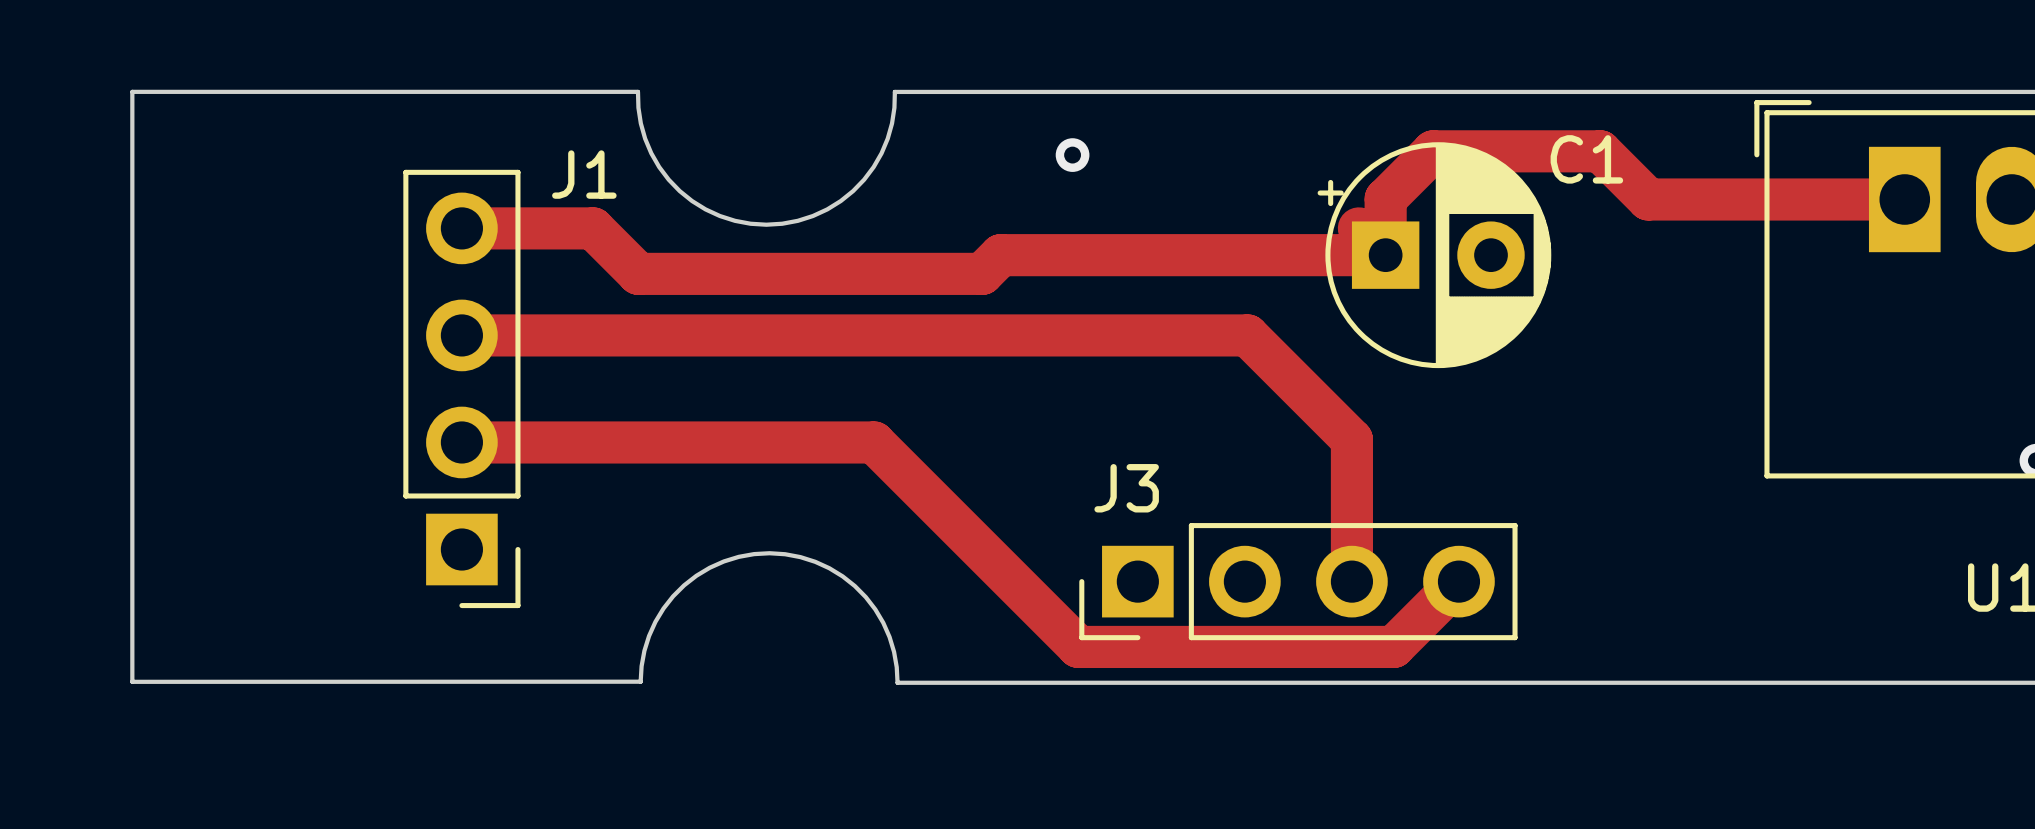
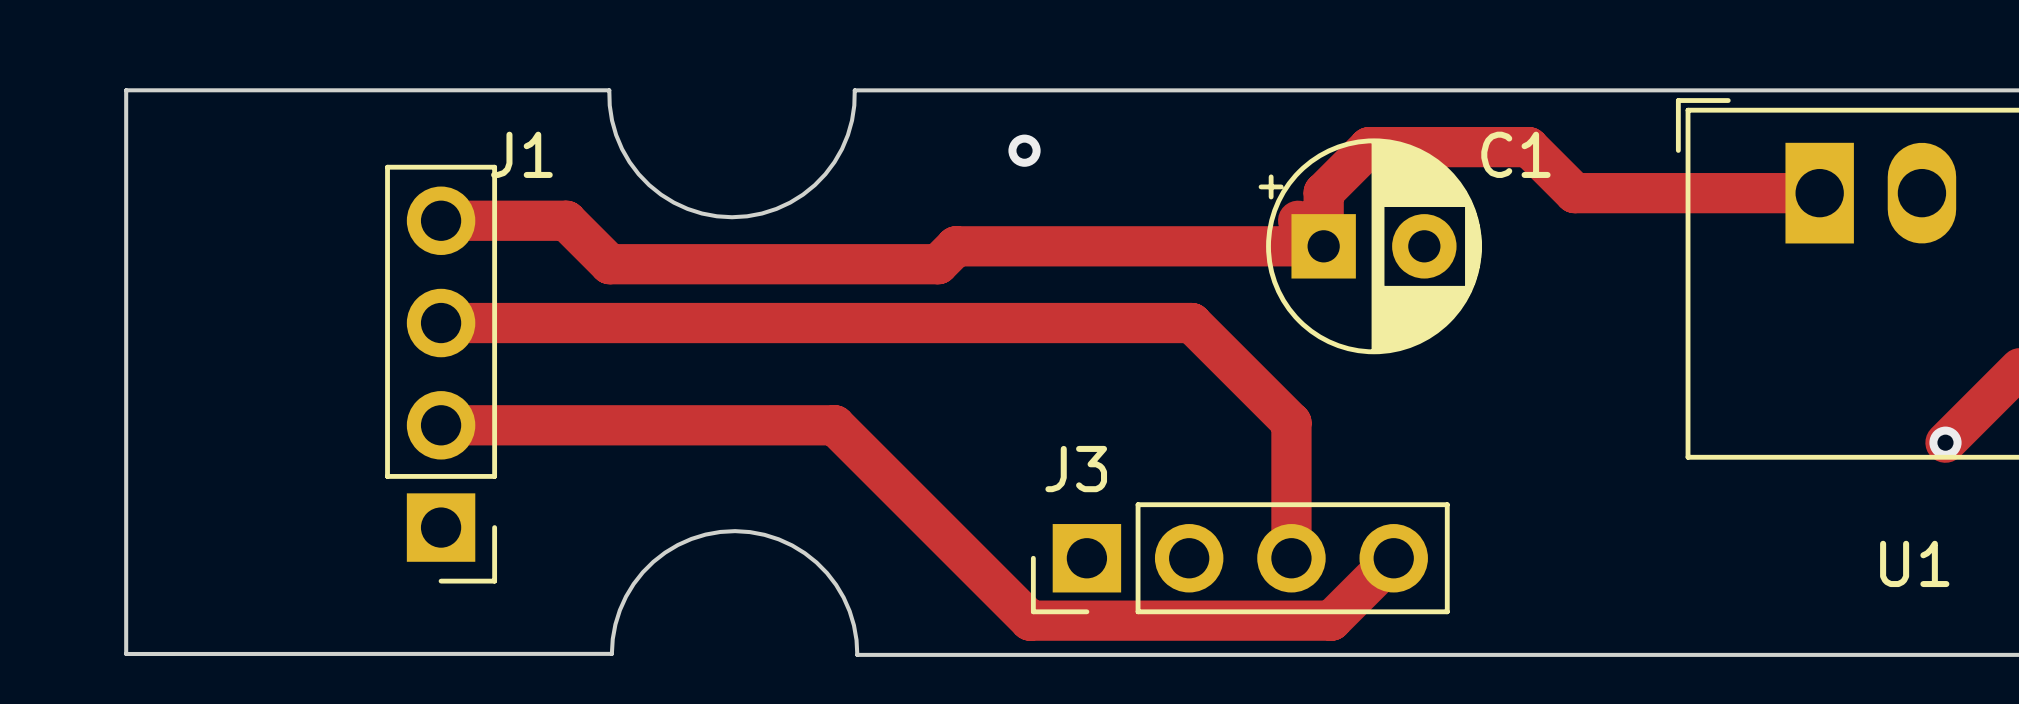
J1 name position: J1 (584, 174) -> J1 (521, 154)

